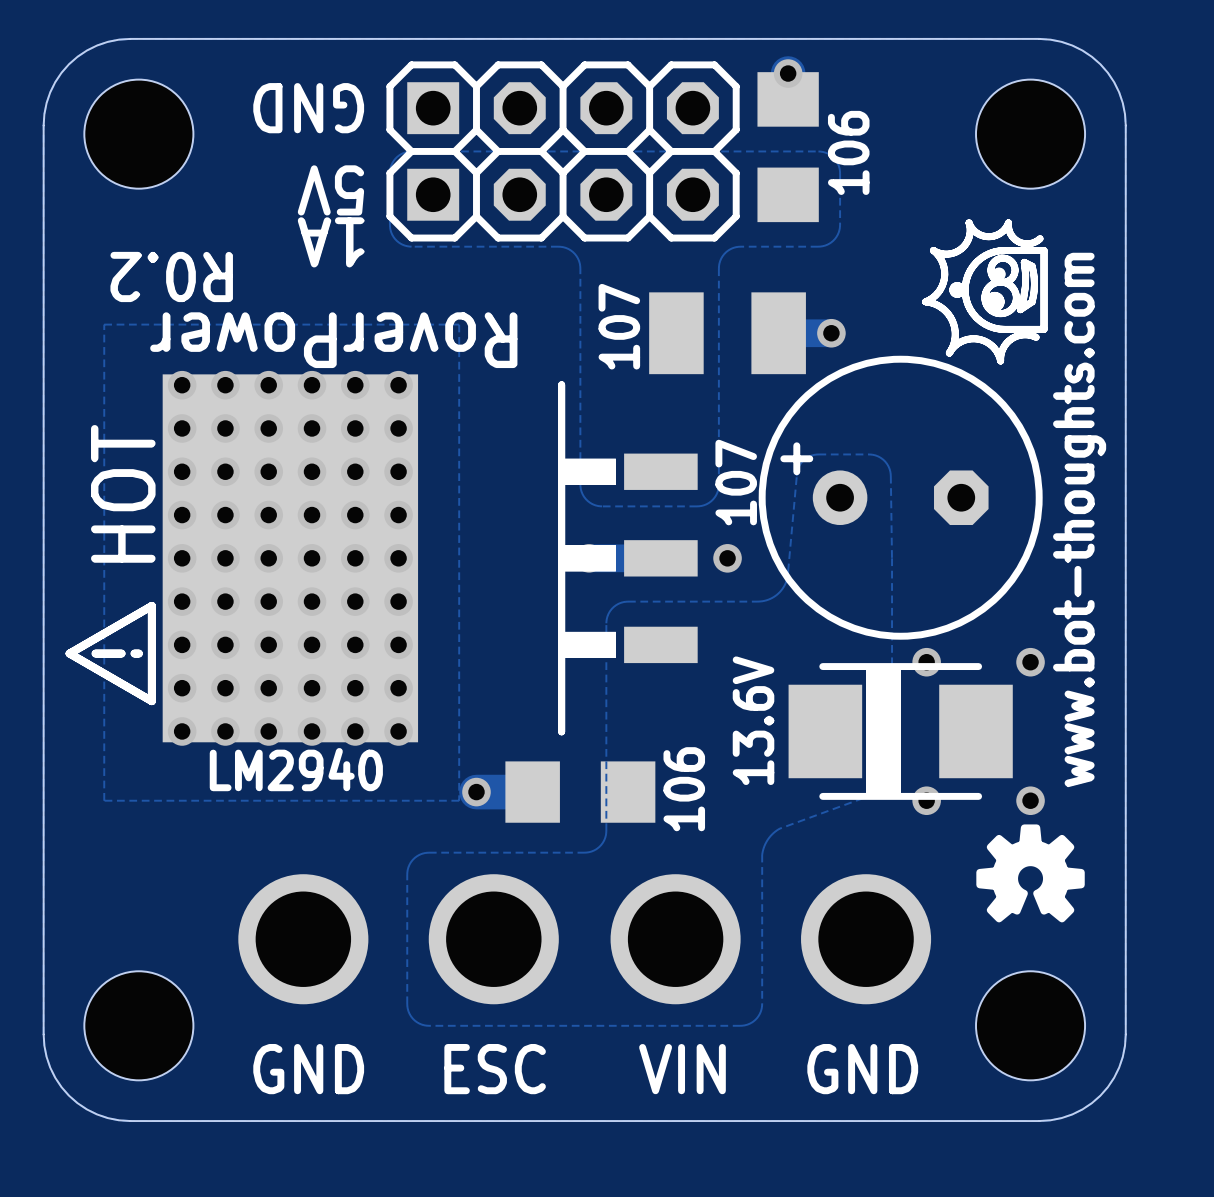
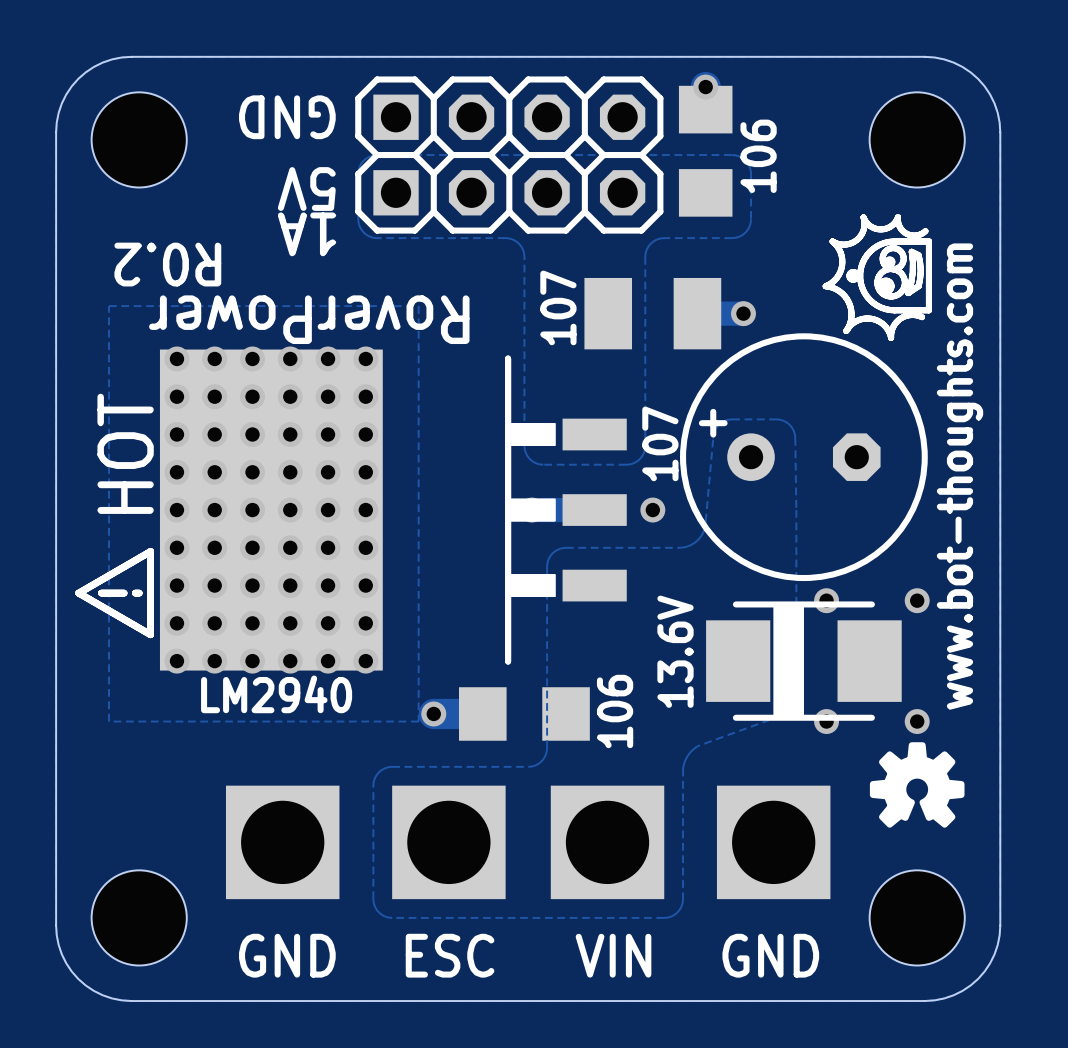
part footprint: [238, 874, 369, 1005] -> [225, 785, 340, 900]
part footprint: [428, 874, 559, 1005] -> [392, 785, 506, 900]
part footprint: [610, 874, 741, 1005] -> [550, 785, 665, 900]
part footprint: [801, 874, 932, 1005] -> [716, 785, 831, 900]

